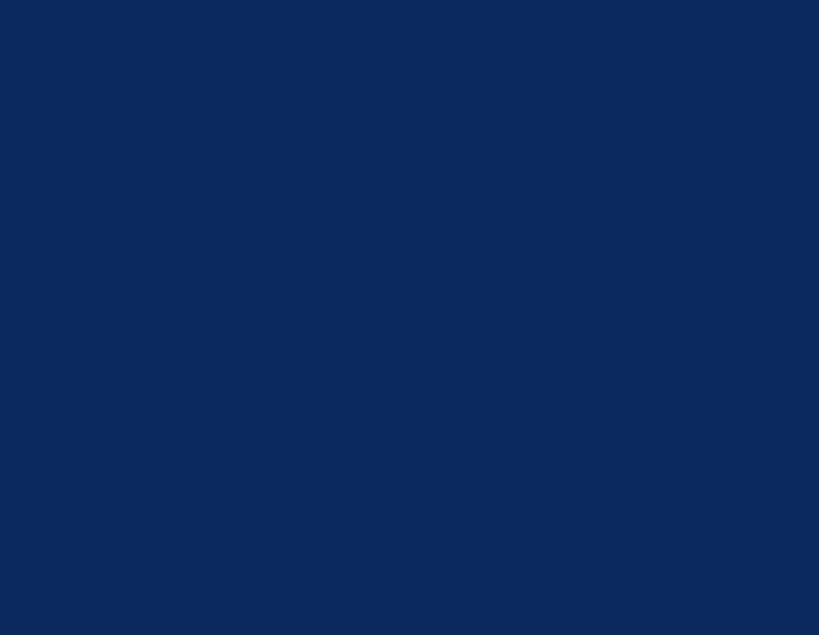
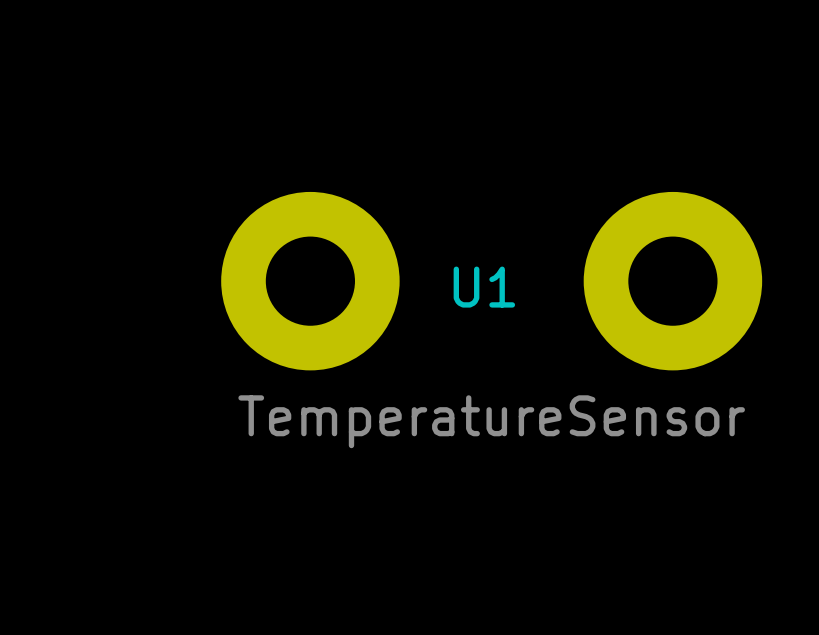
U1: none -> TemperatureSensor (491, 281)

